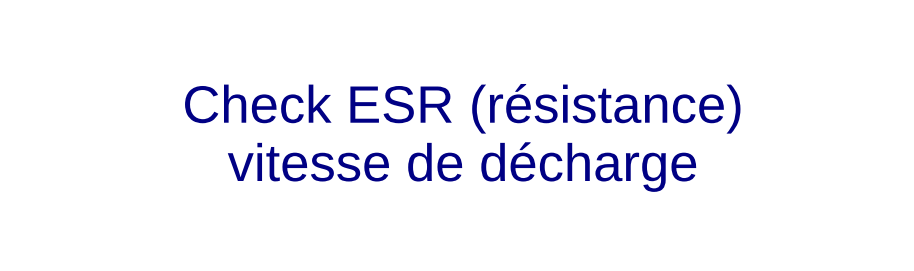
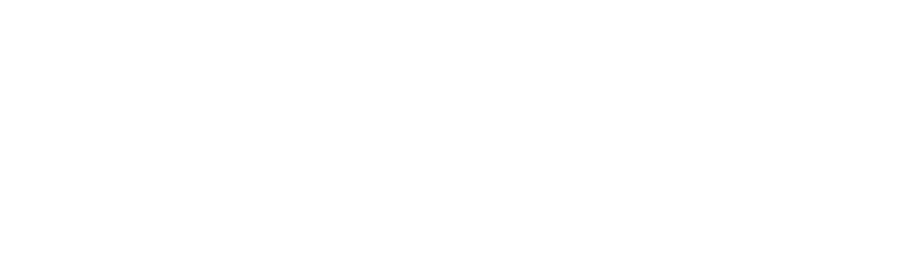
text: Check ESR (résistance) (462, 108) -> none
text: vitesse de décharge (461, 167) -> none

